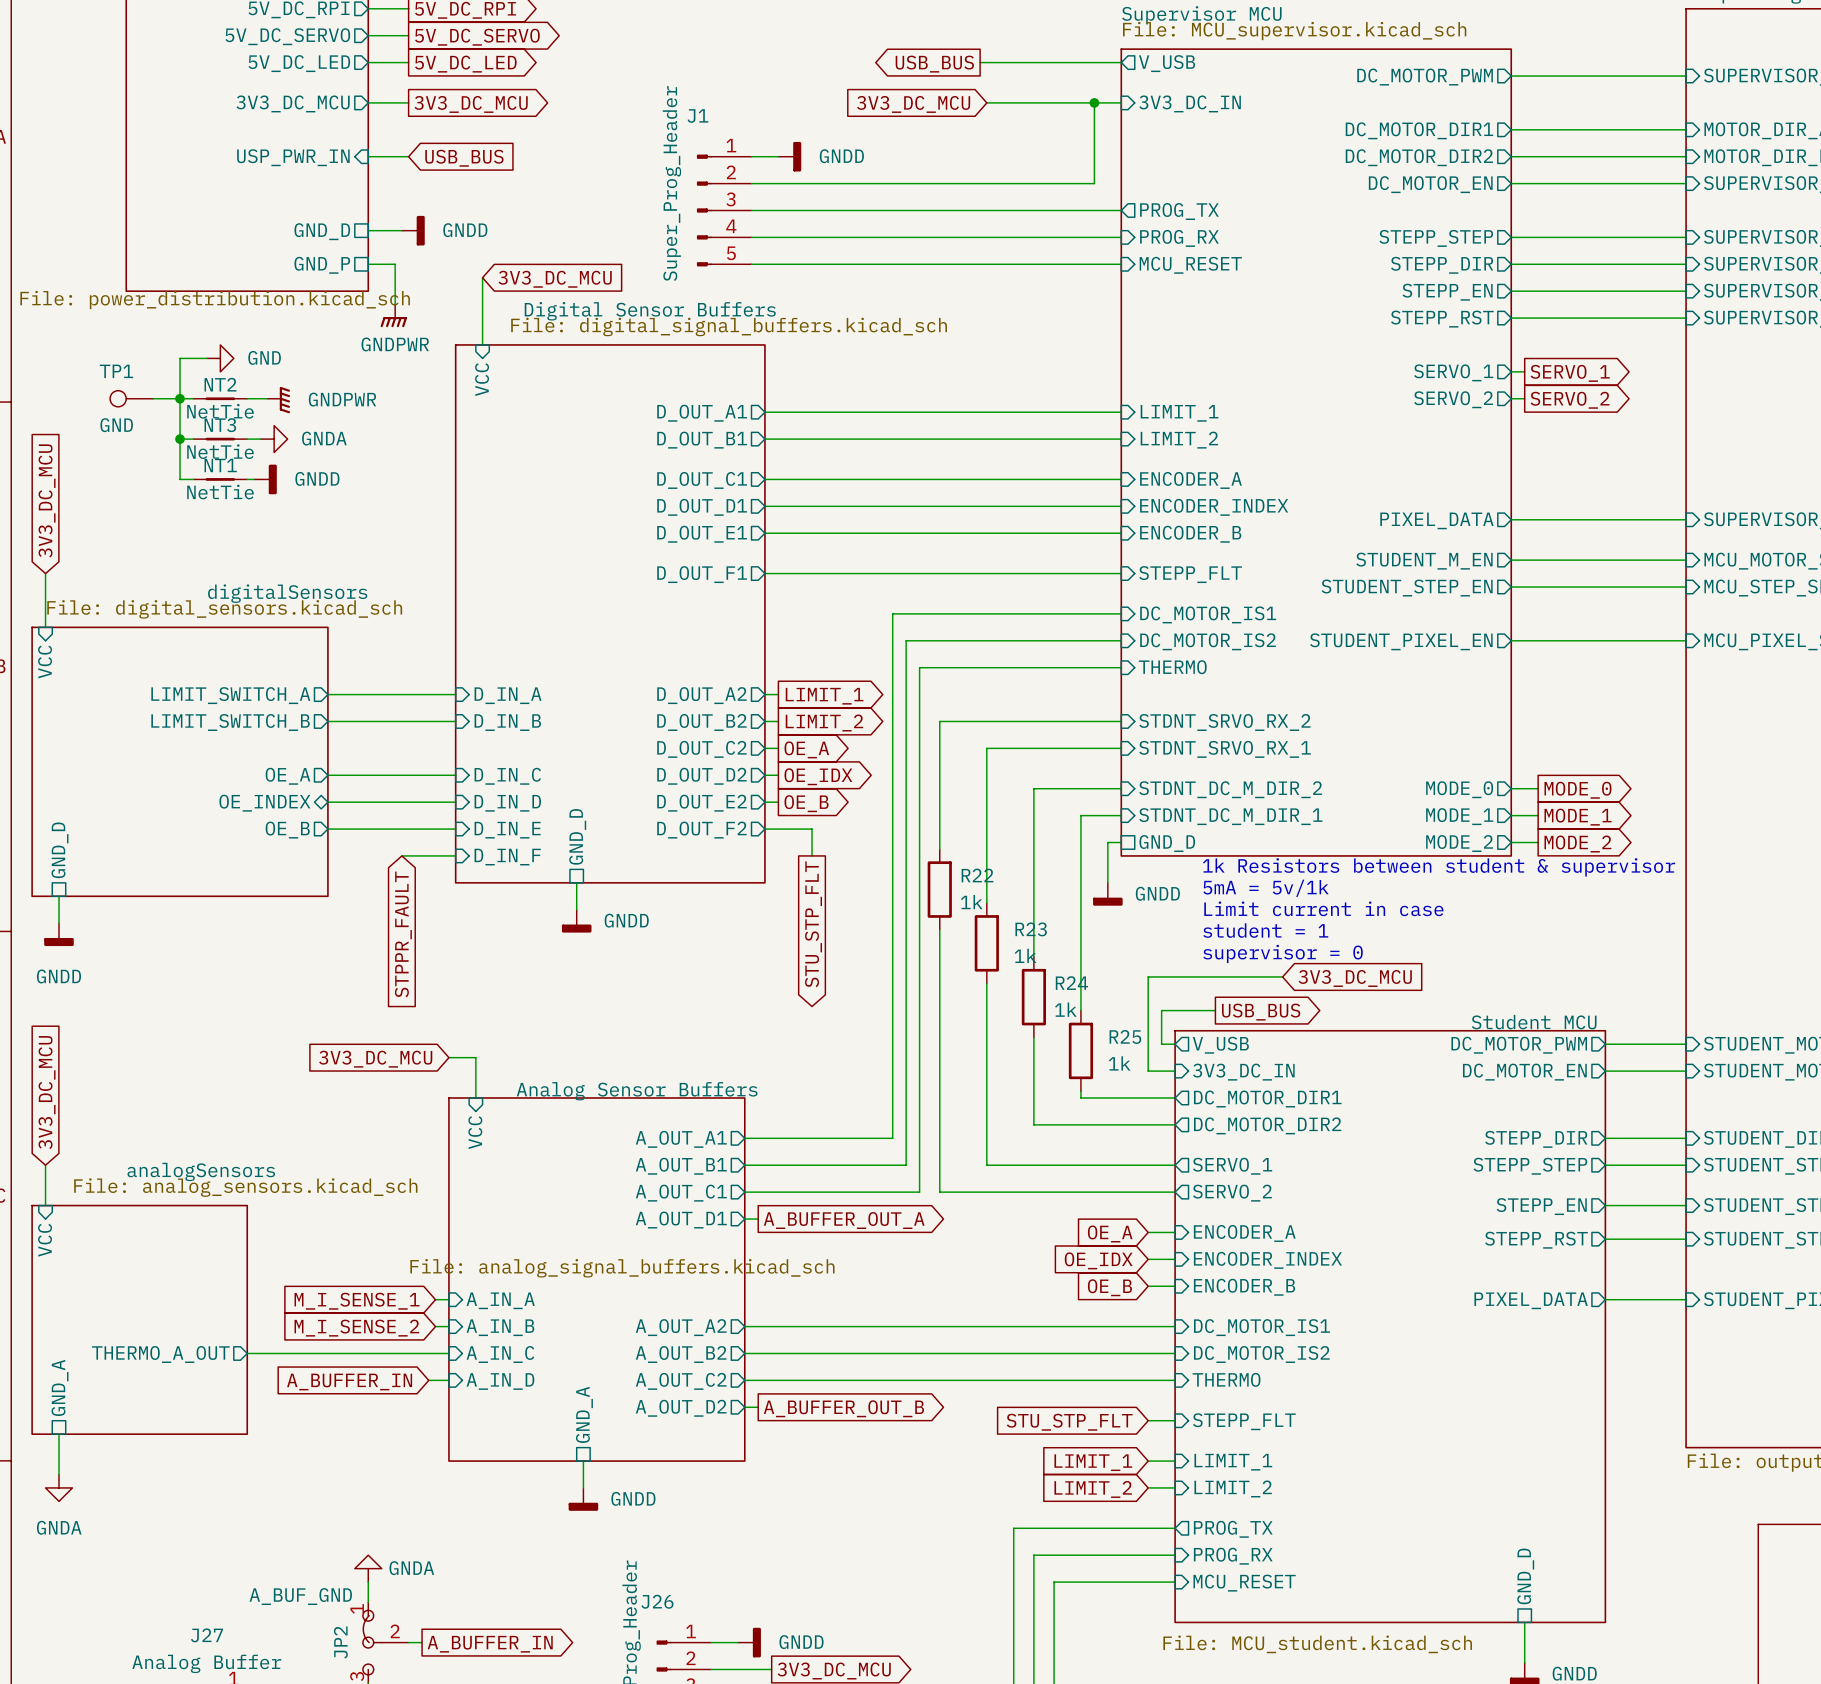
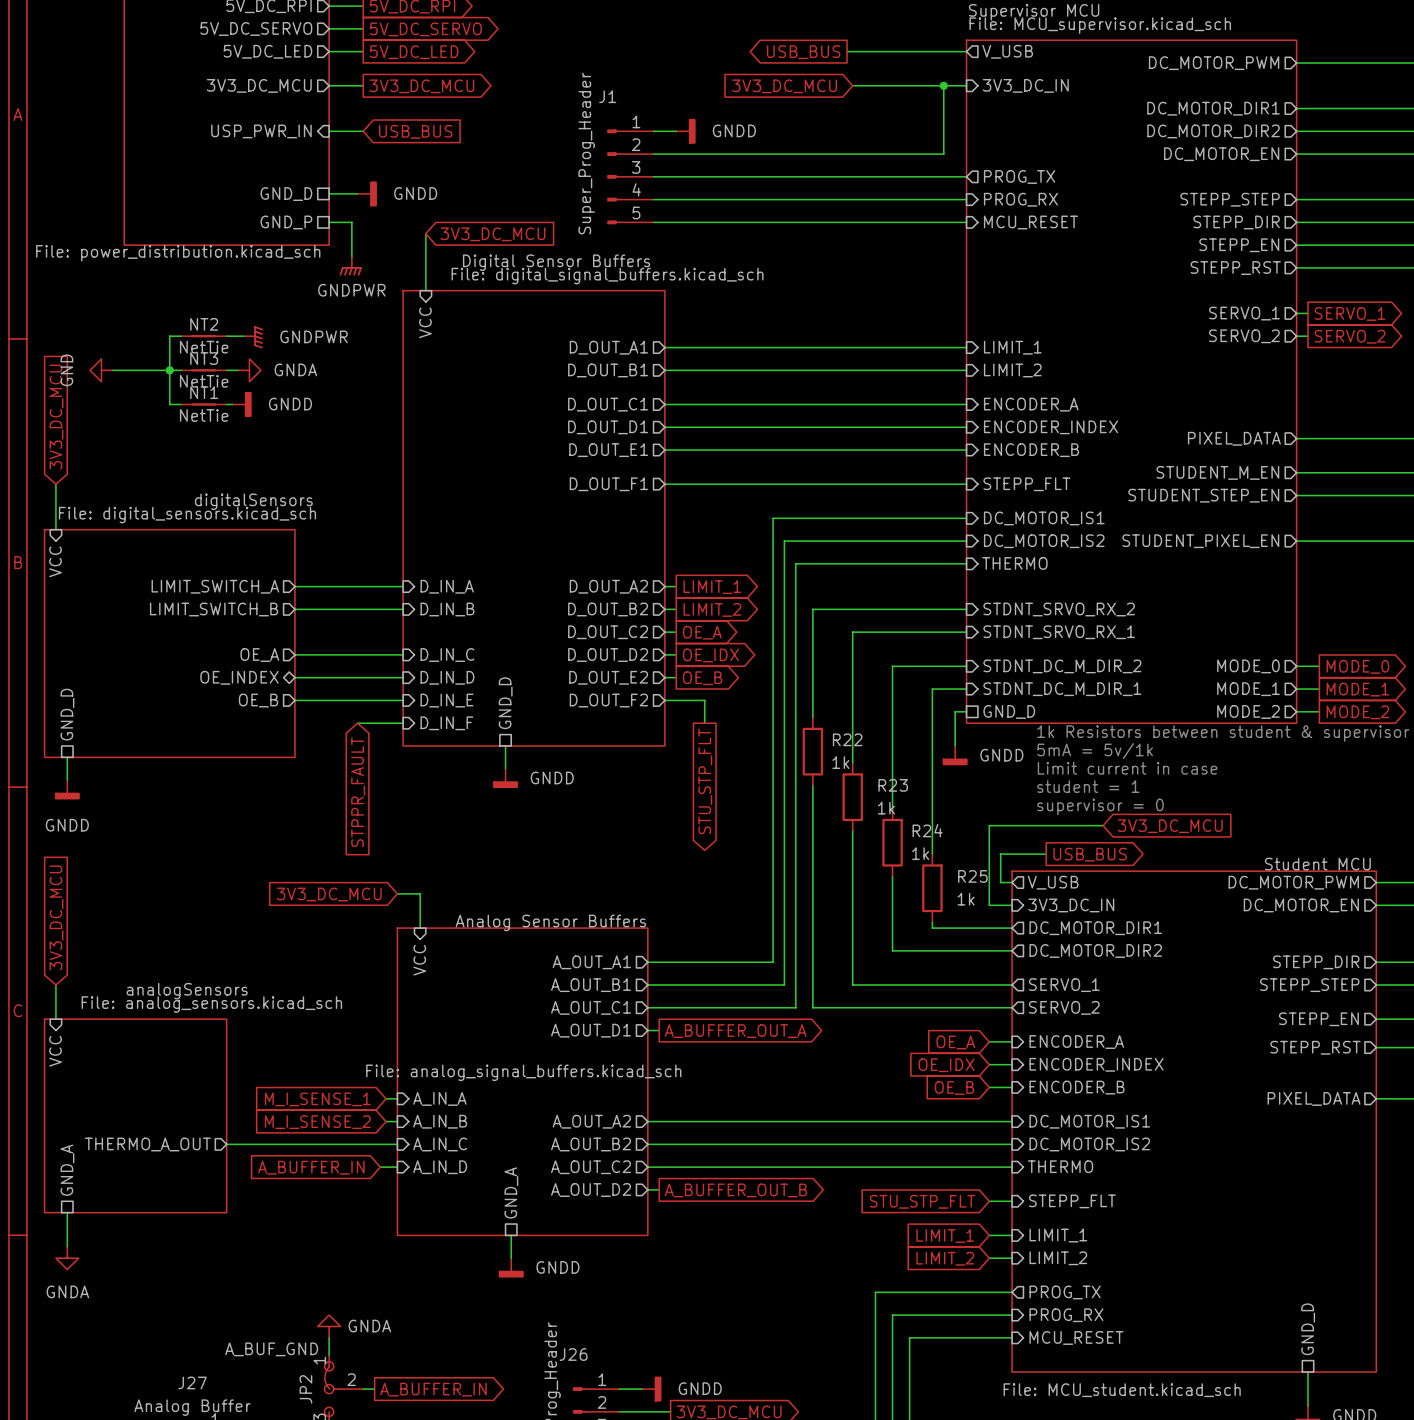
wire: (206, 358) (180, 358) (180, 398) (153, 398) -> none
power symbol rotation: 0° (220, 358) -> 180° (101, 370)
power symbol position: GND (220, 358) -> GND (101, 370)
TP1: GND (131, 398) -> none
junction: (180, 398) -> none
wire: none -> (112, 370) (169, 370)

